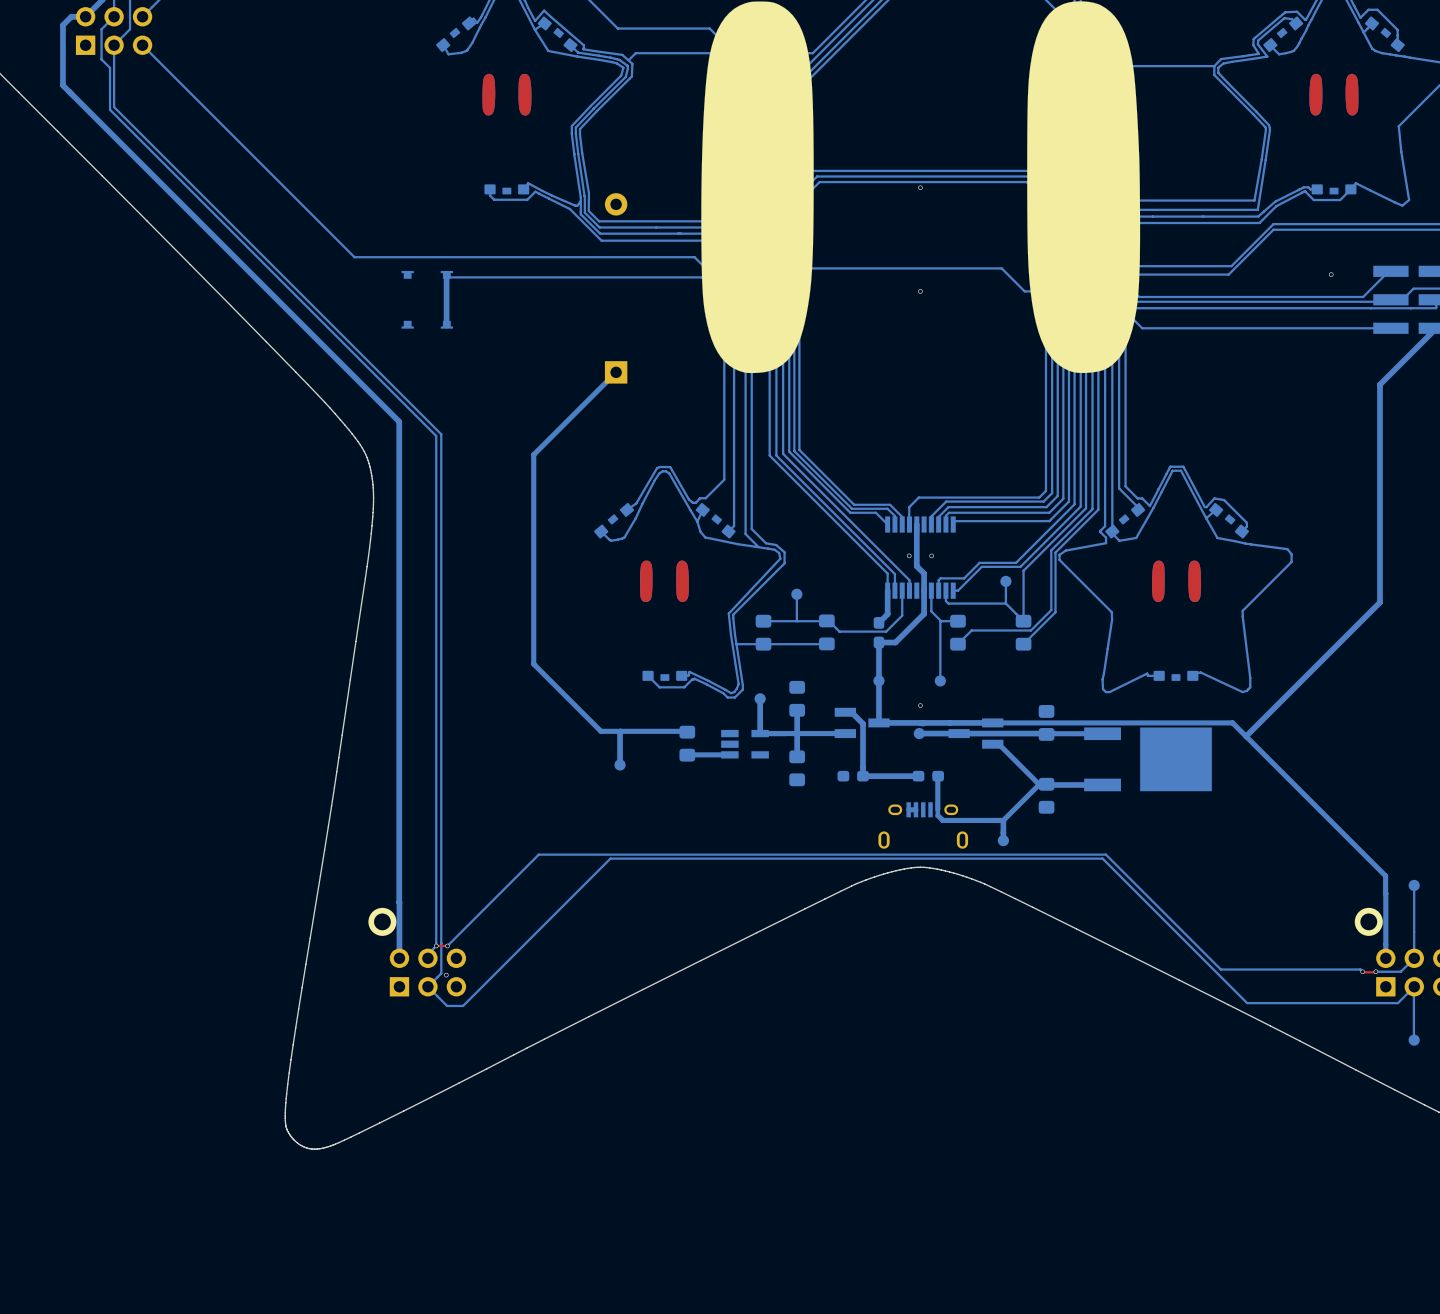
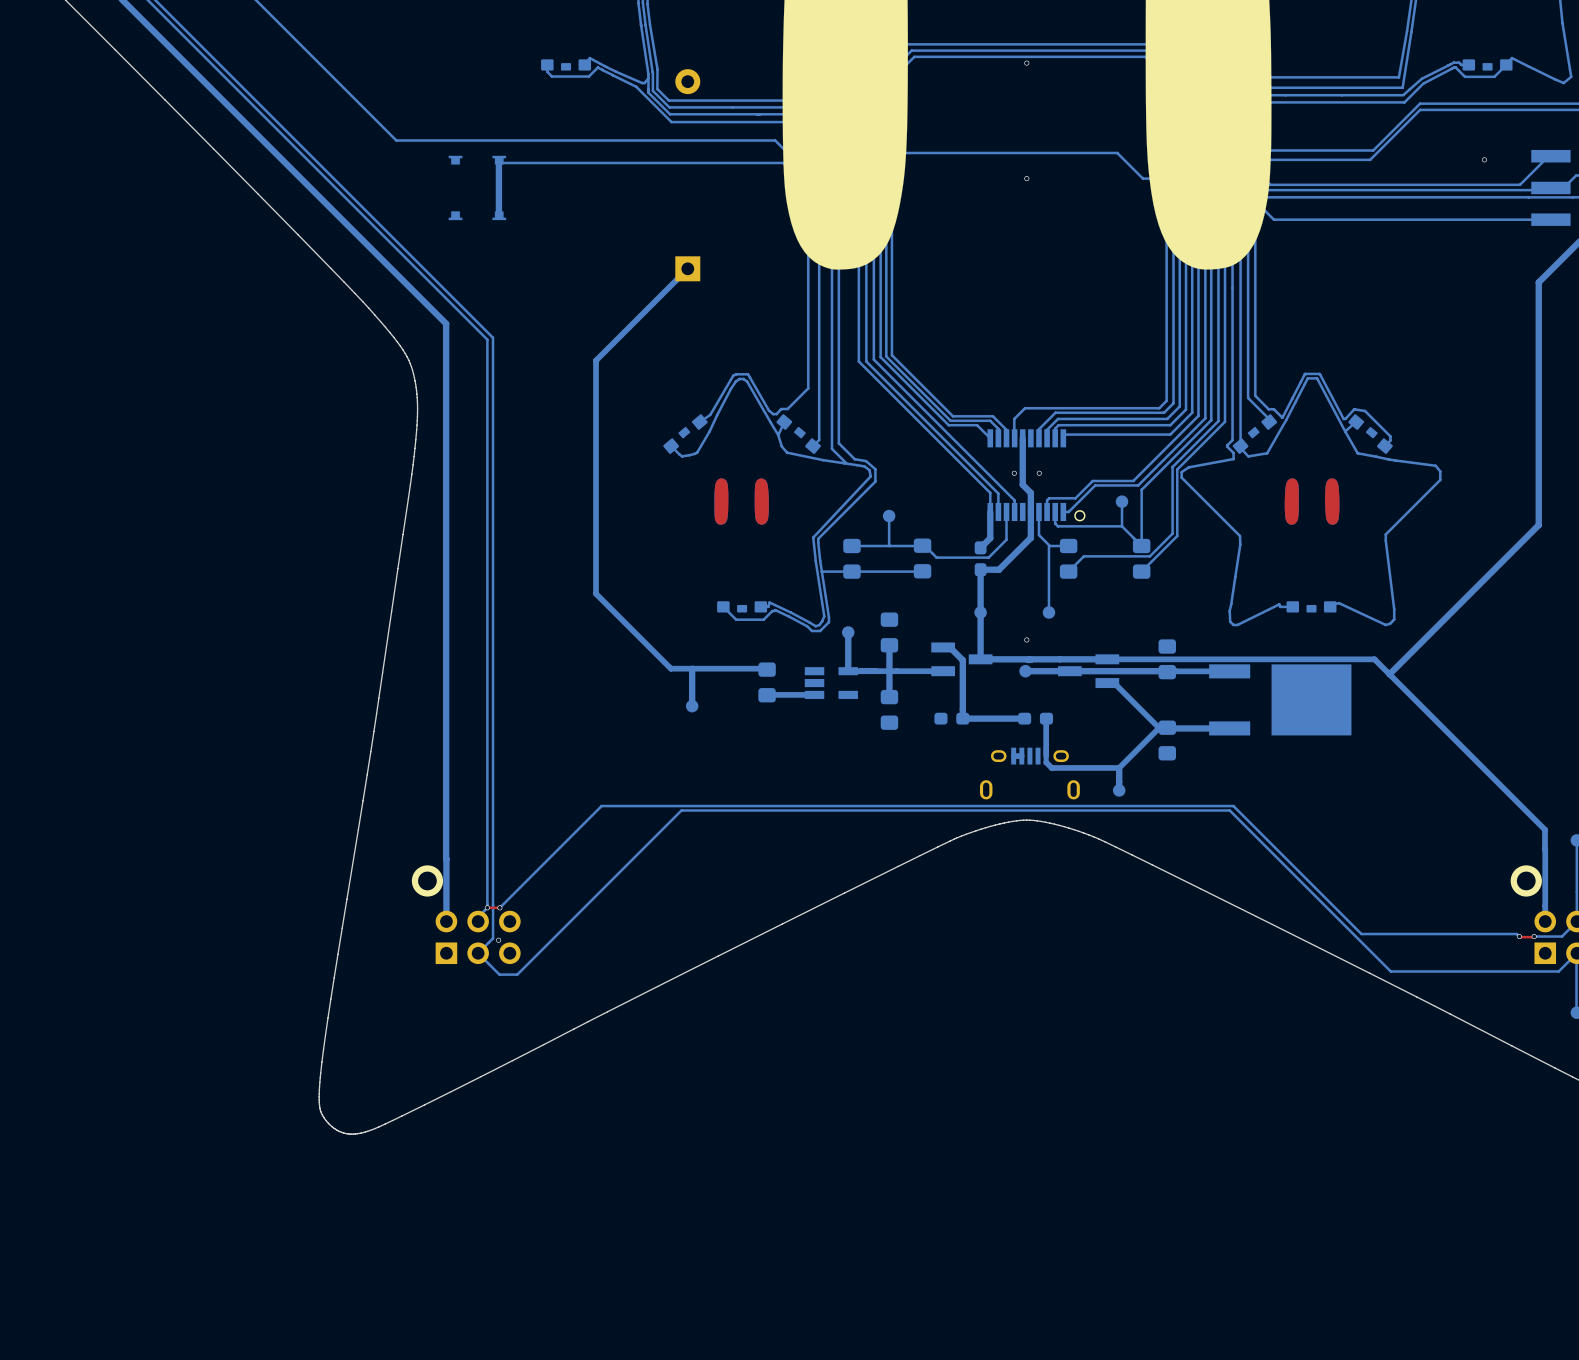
drawing: none -> [1074, 510, 1086, 522]

